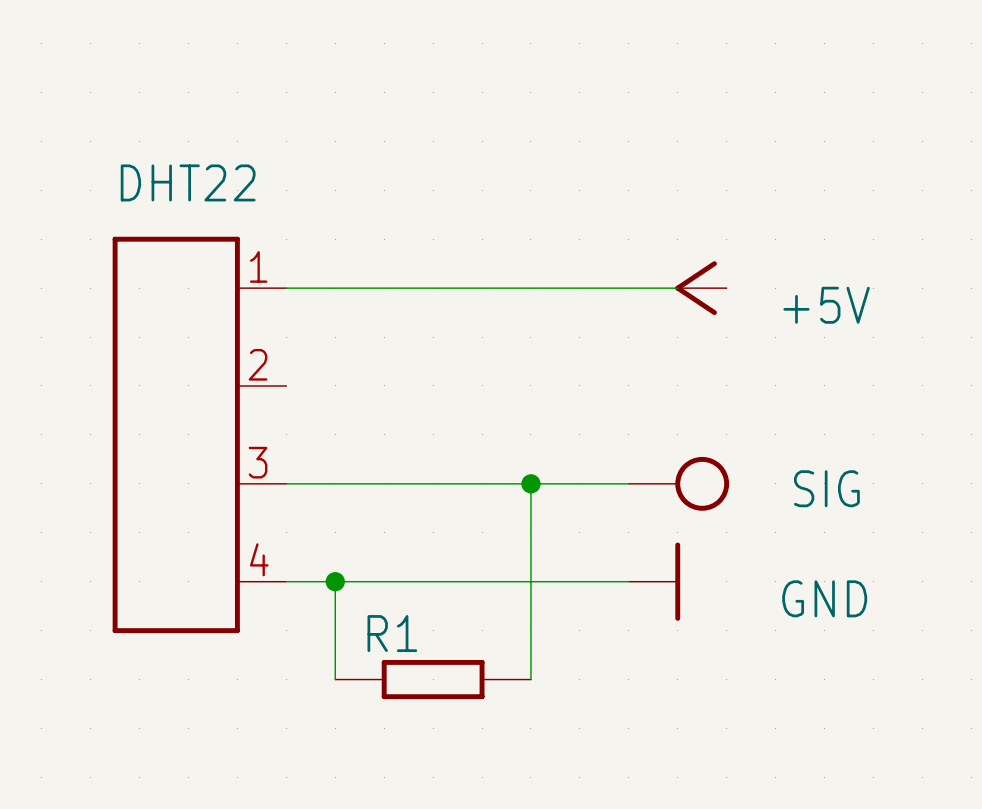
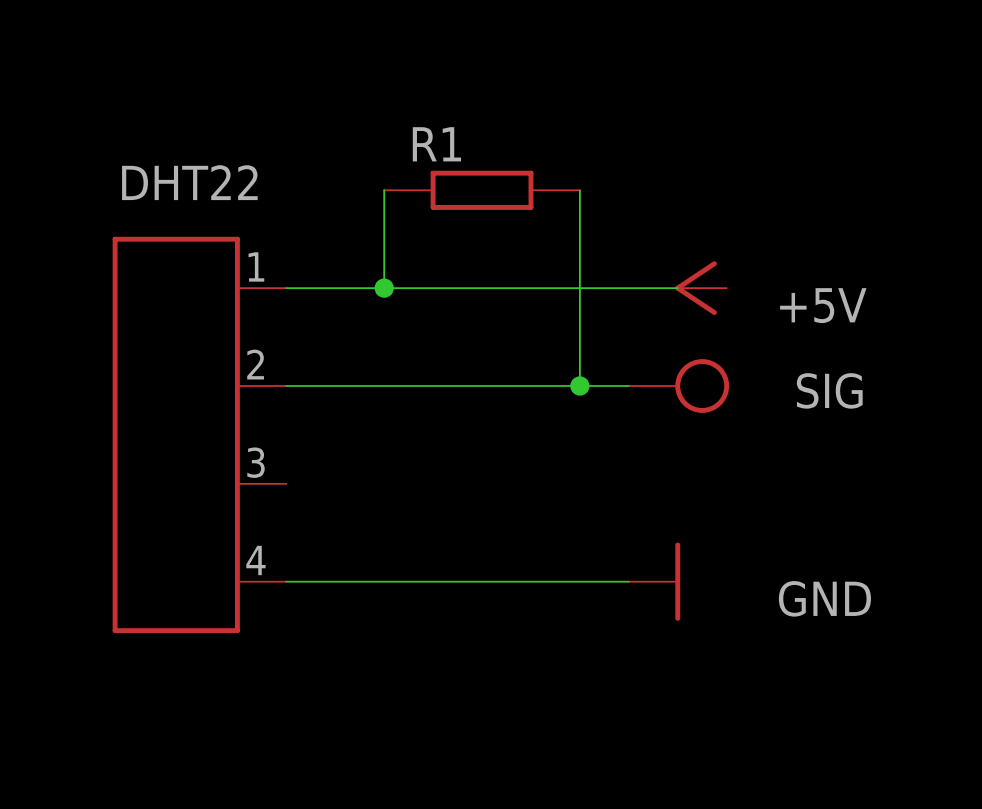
junction: none -> (384, 288)
wire: (286, 483) (628, 483) -> (286, 385) (628, 385)
wire: (530, 483) (530, 679) -> (579, 190) (579, 385)
junction position: (530, 483) -> (579, 385)
power symbol position: SIG (678, 483) -> SIG (678, 385)
wire: (335, 581) (335, 679) -> (384, 190) (384, 288)
junction: (335, 581) -> none
R1 position: (433, 679) -> (482, 190)

